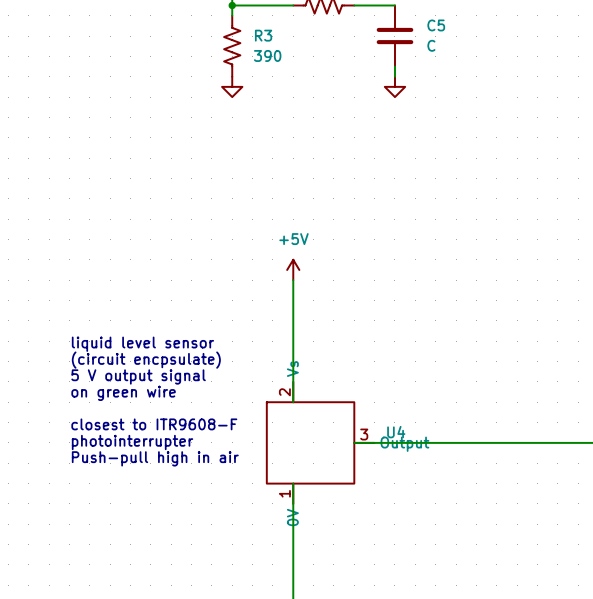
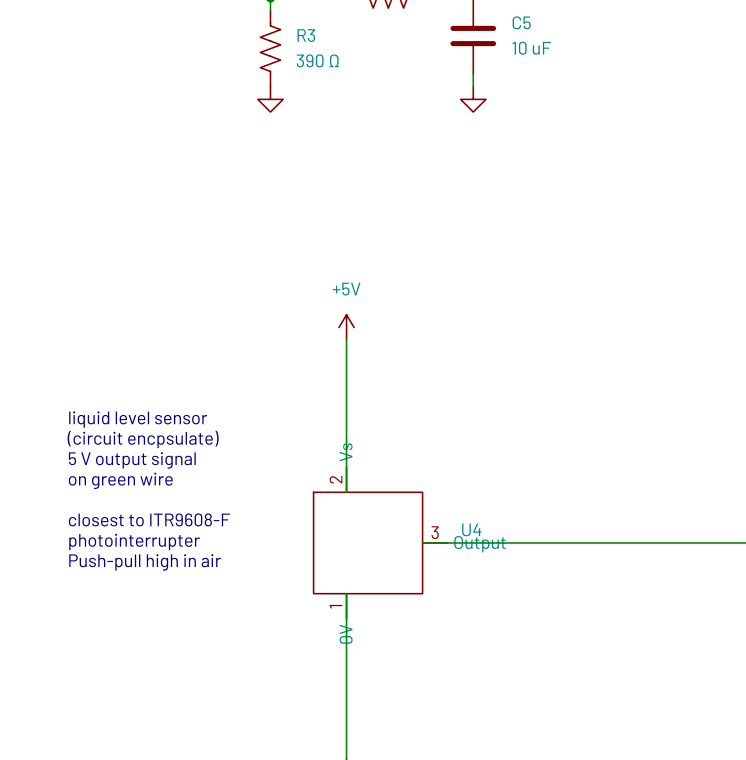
C5 value: C (431, 45) -> 10 uF (531, 48)
R3 value: 390 (267, 55) -> 390 Ω (317, 60)

